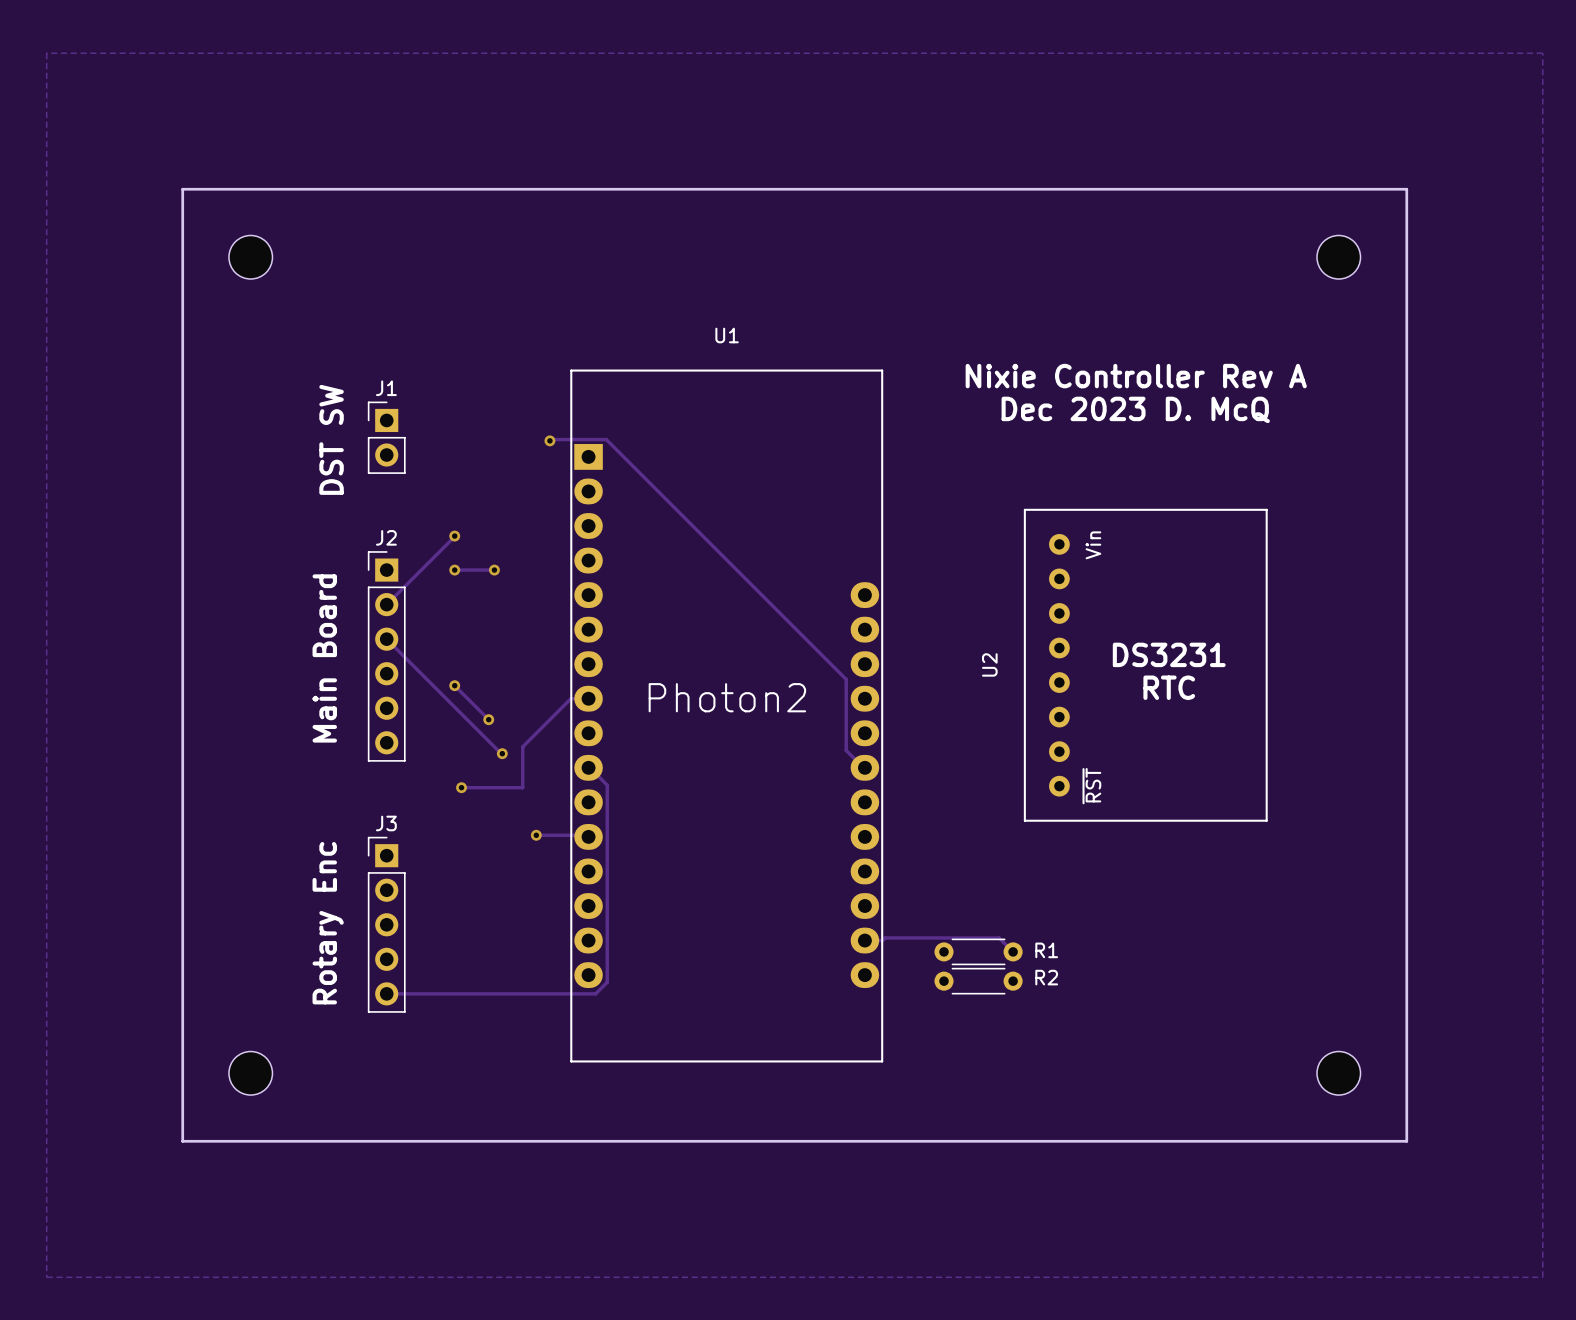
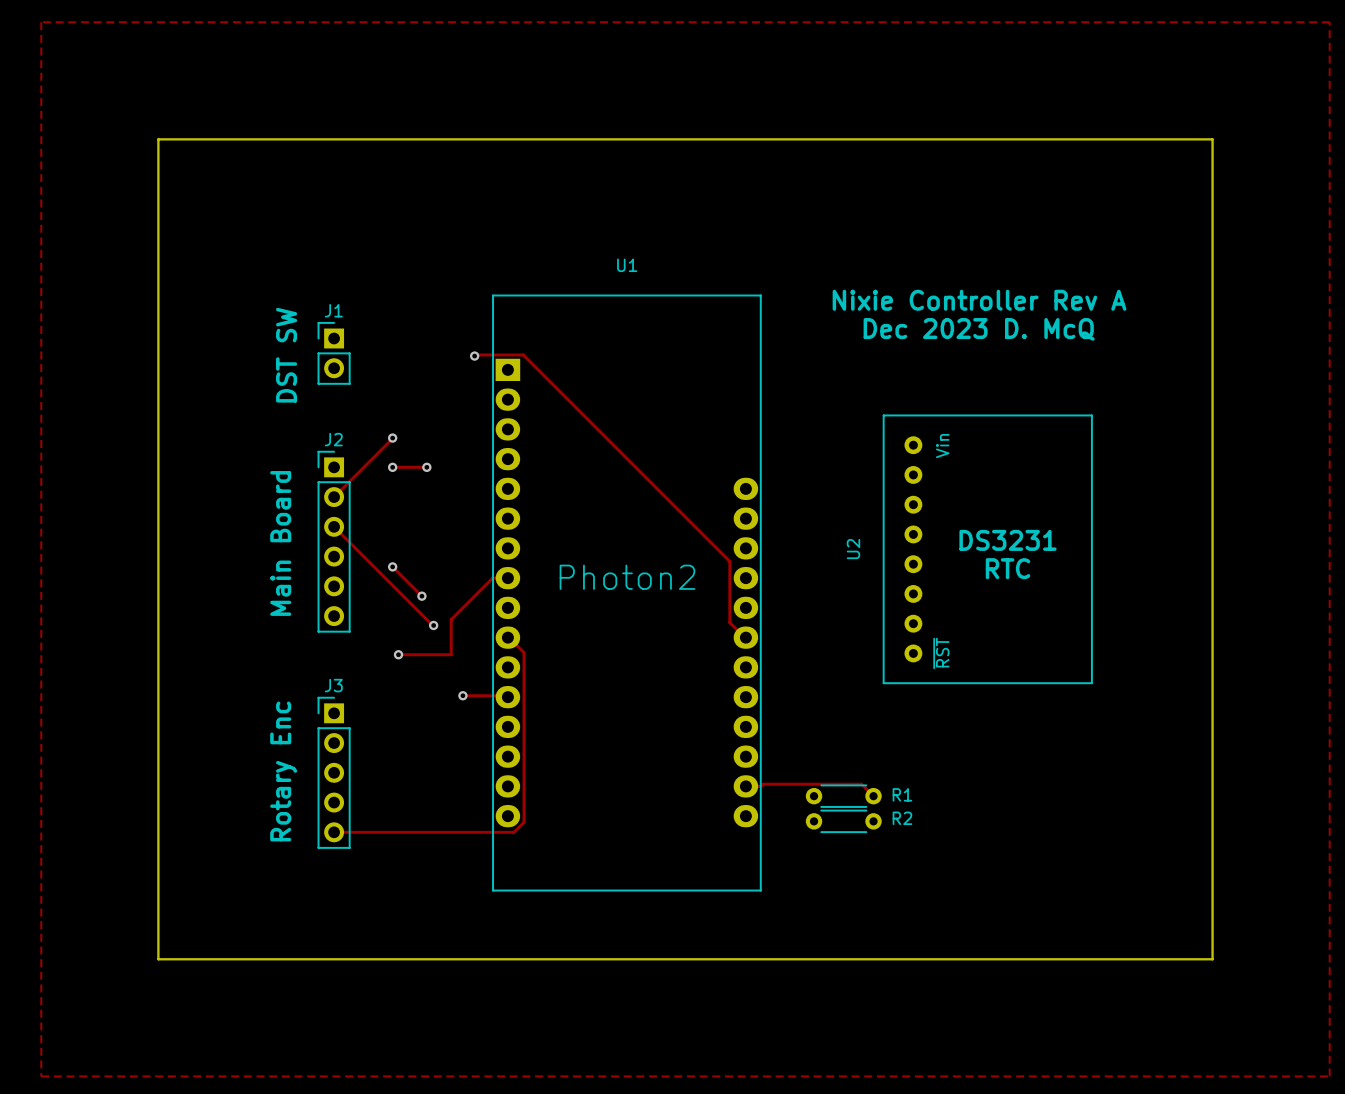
part: (250, 257) -> none
part: (1338, 257) -> none
part: (250, 1073) -> none
part: (1338, 1073) -> none

